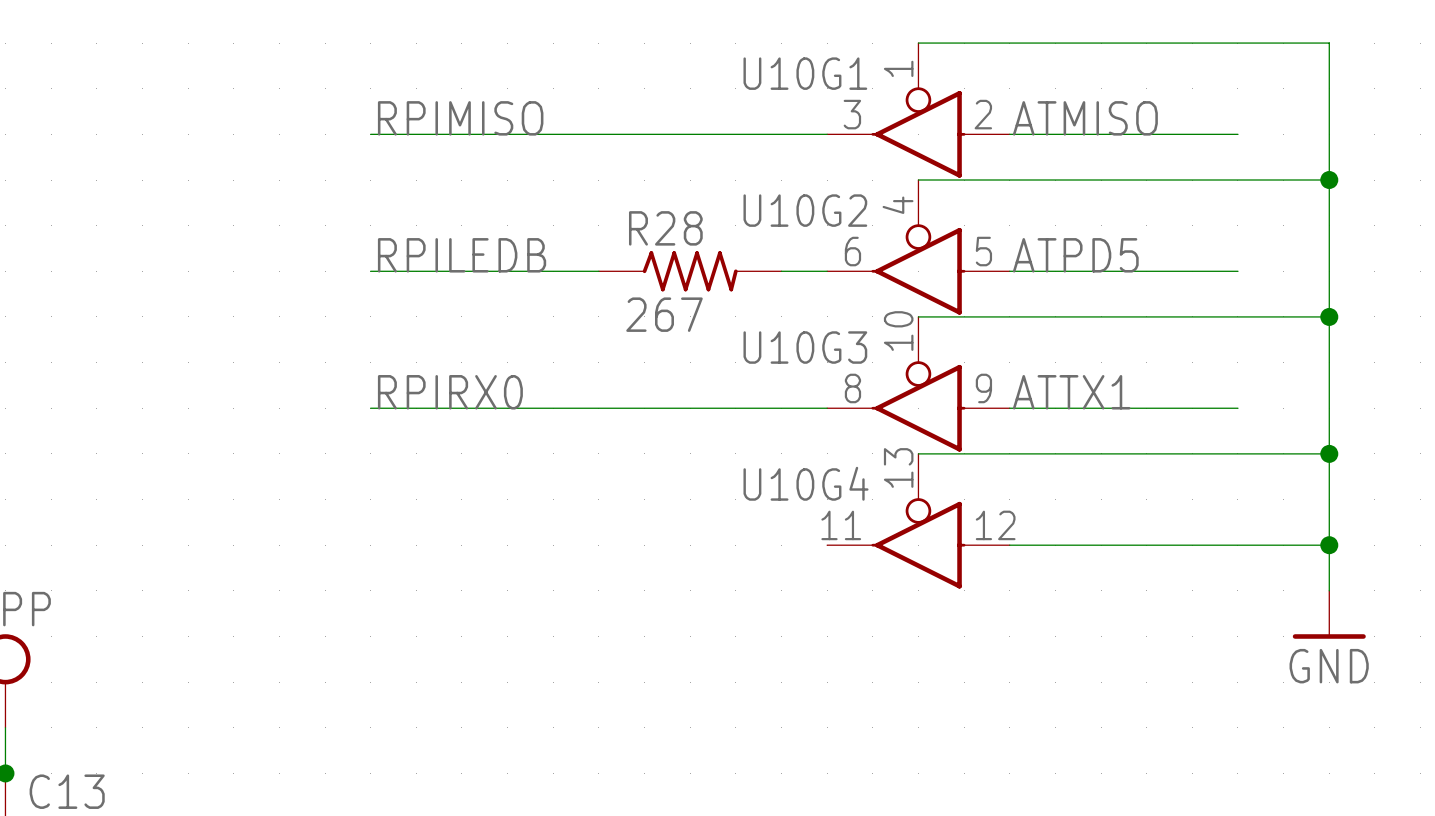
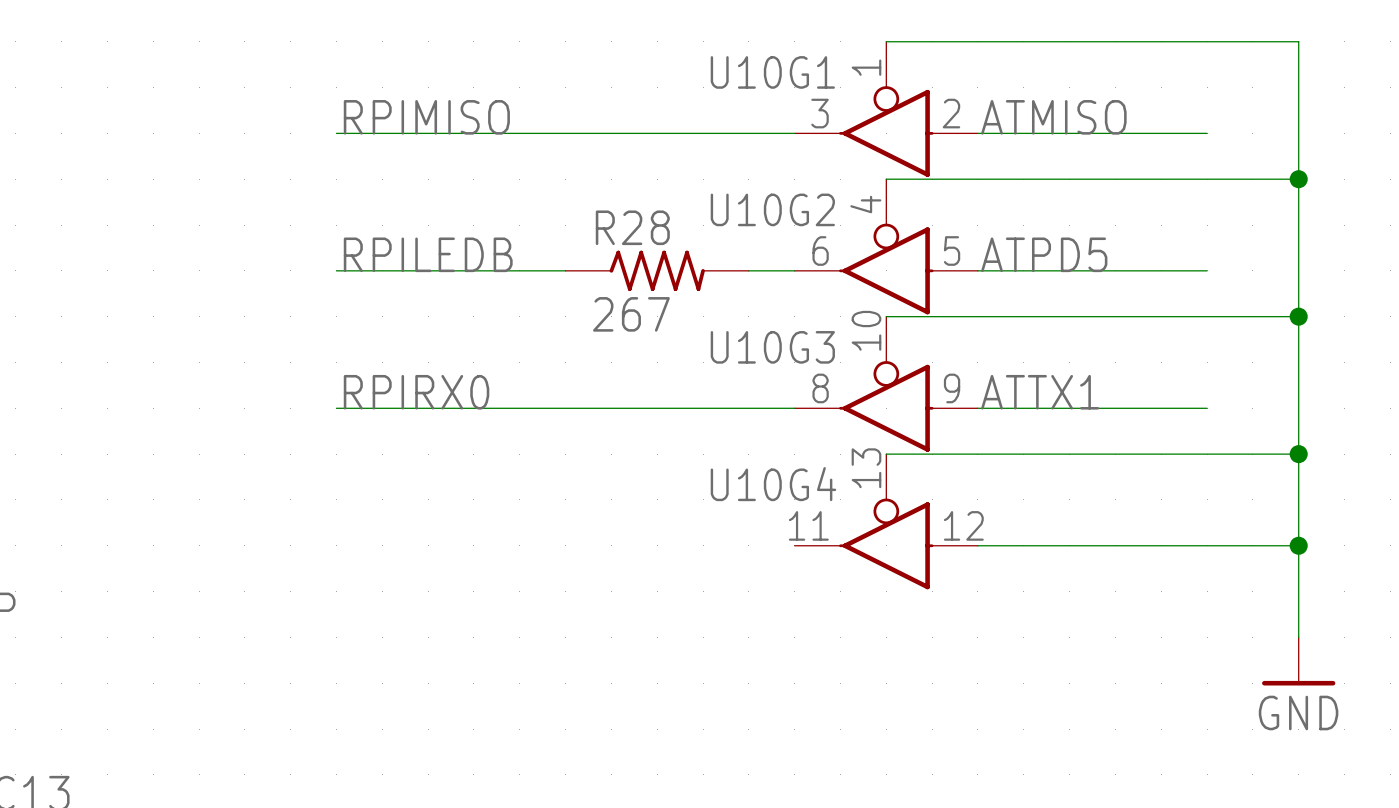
power symbol position: GND (1329, 614) -> GND (1298, 661)

